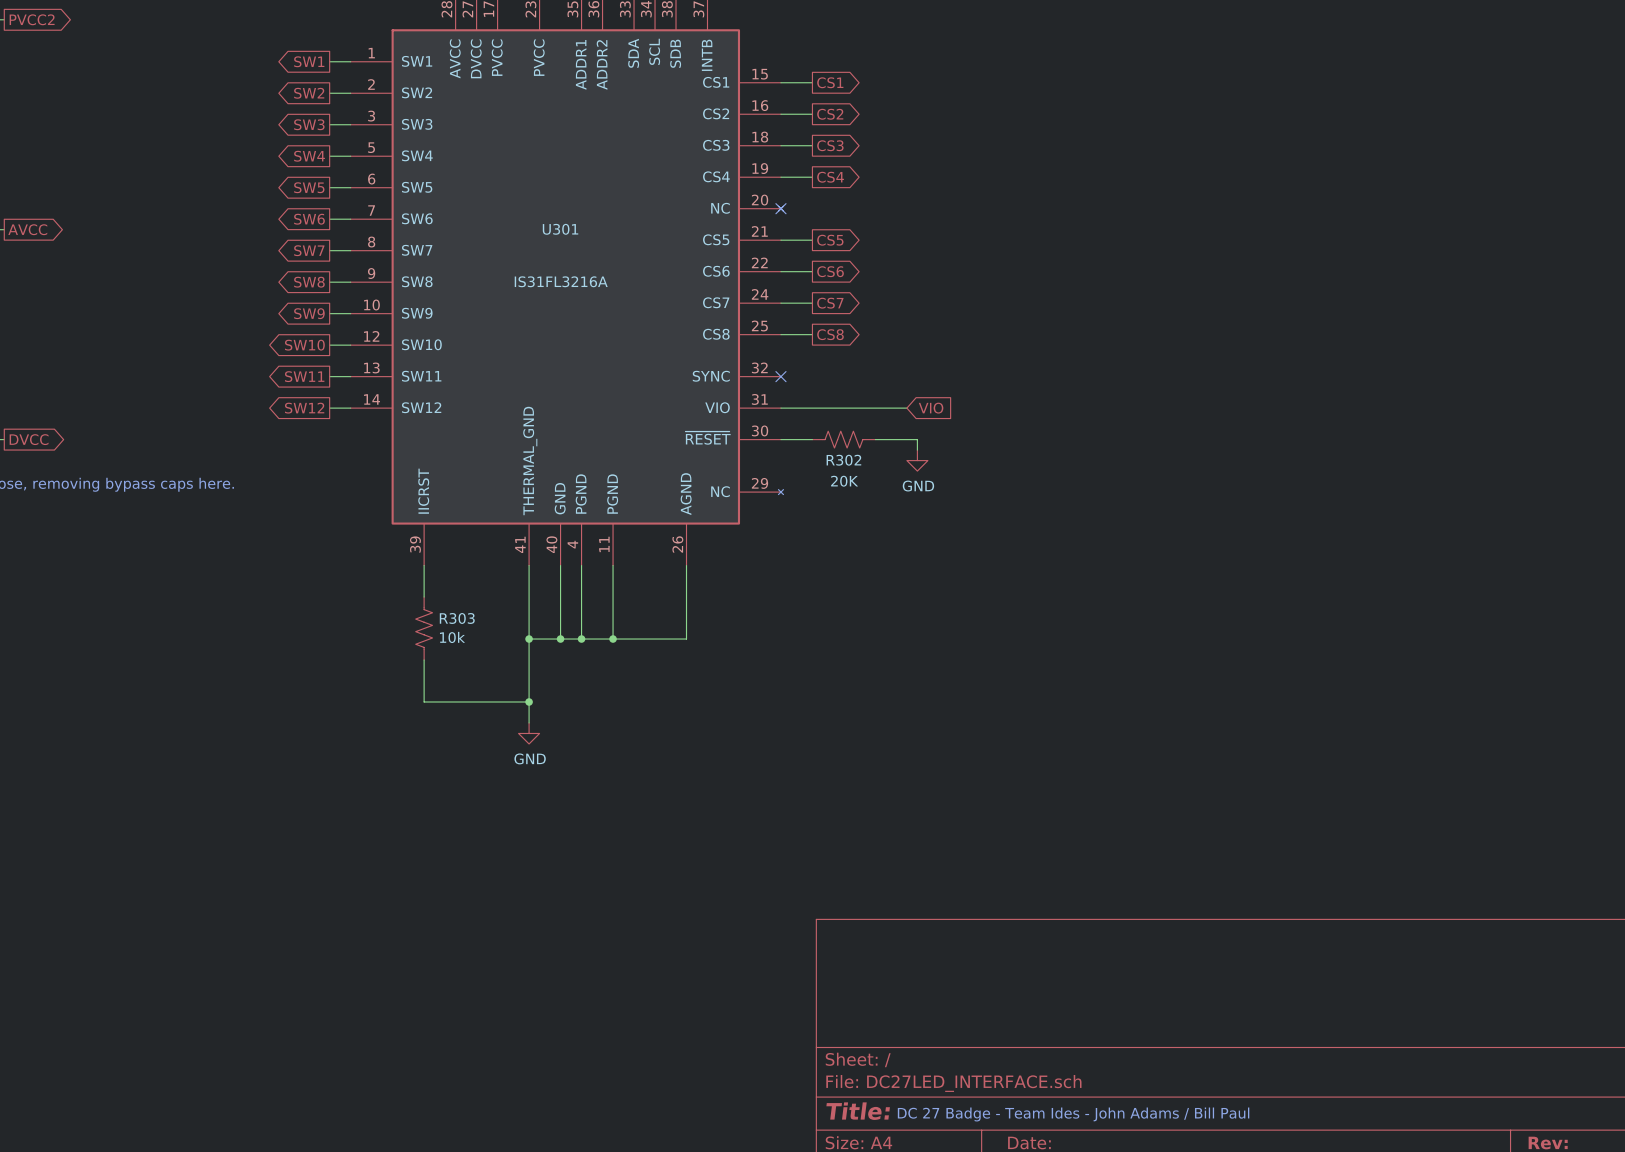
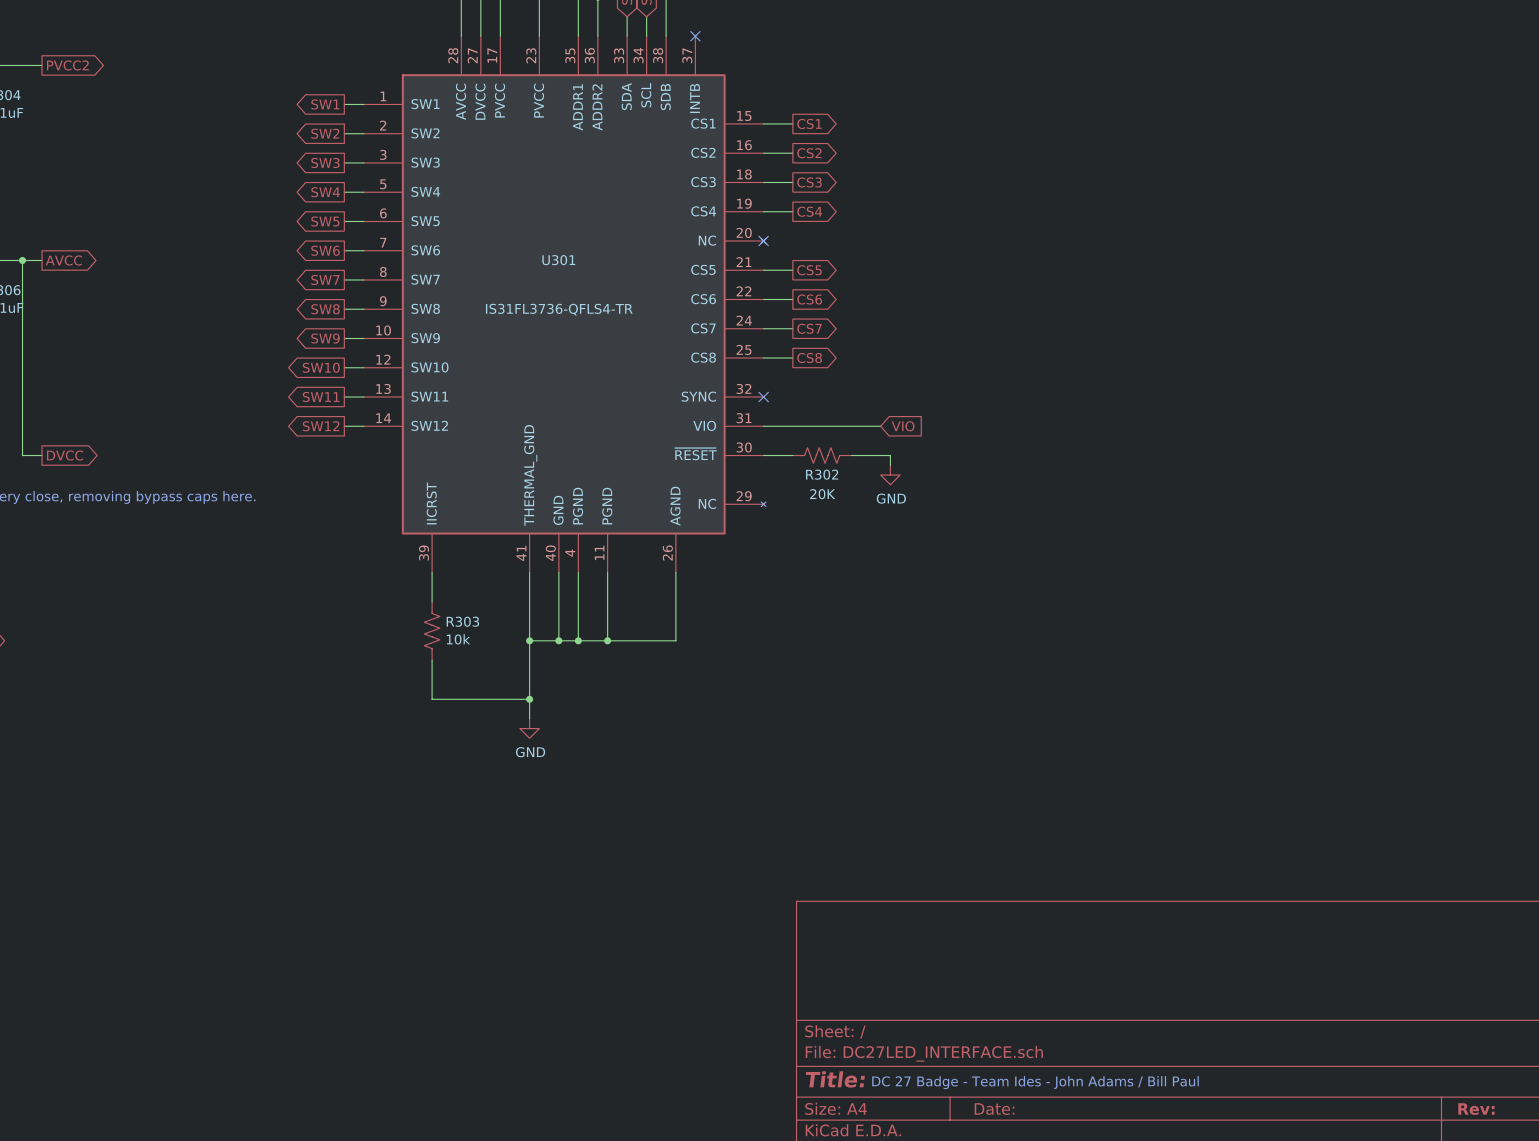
U301 value: IS31FL3216A (561, 281) -> IS31FL3736-QFLS4-TR (559, 309)

